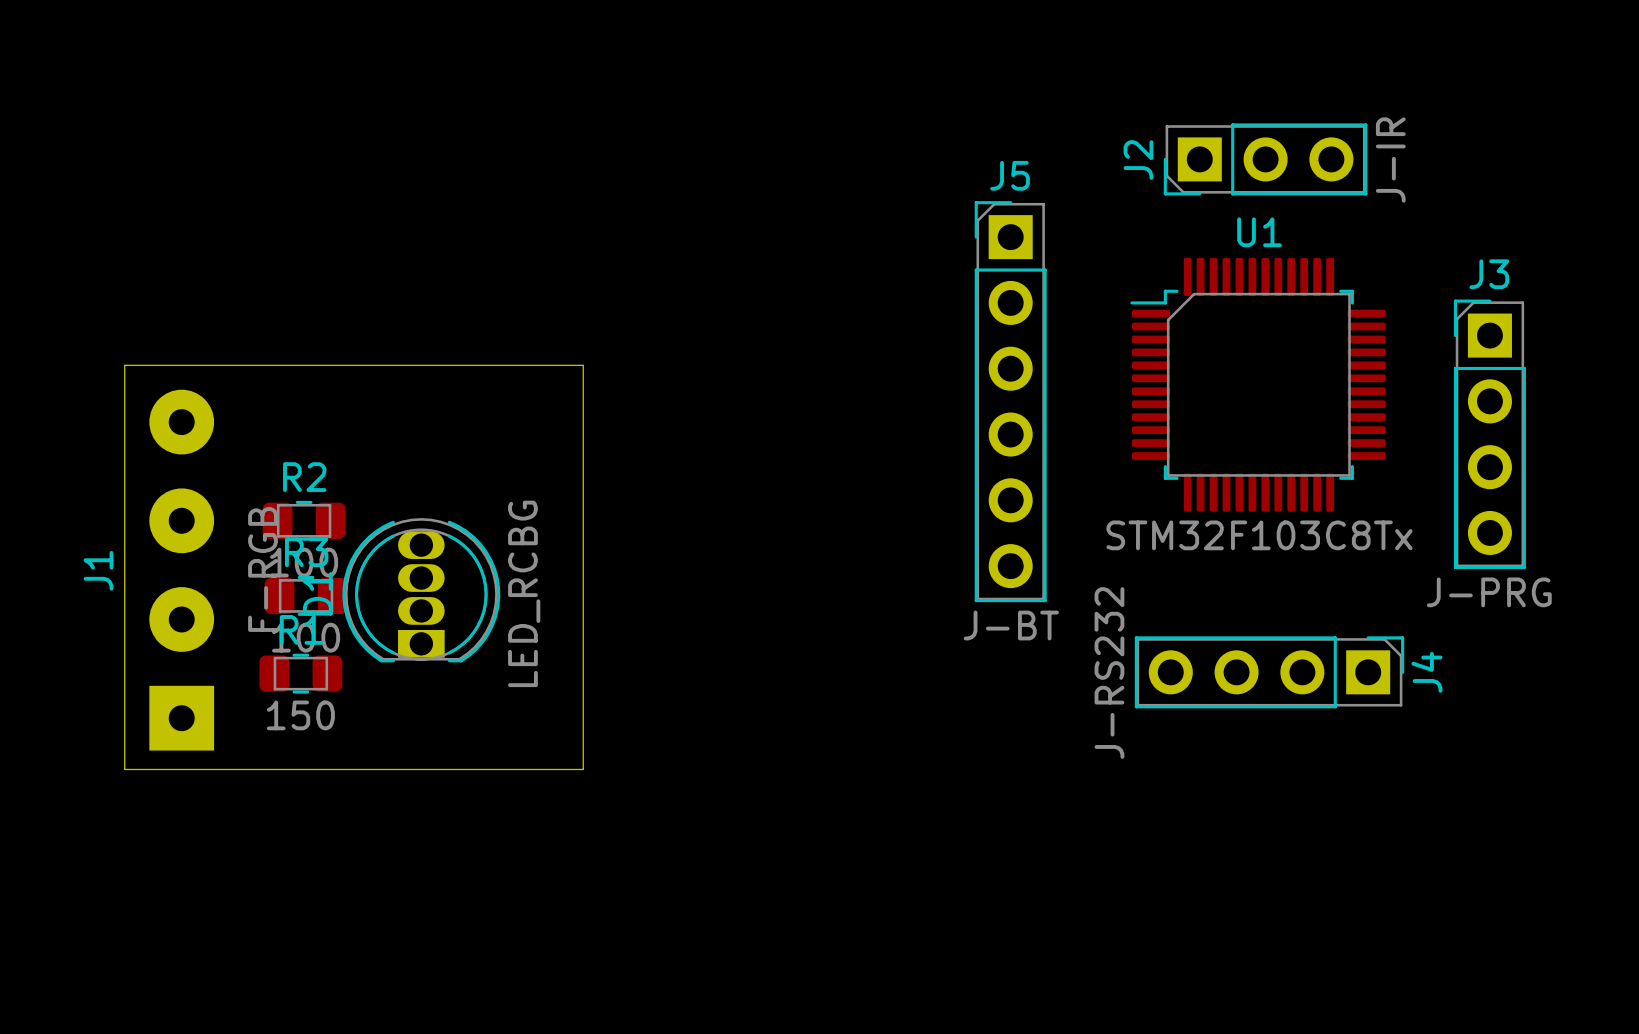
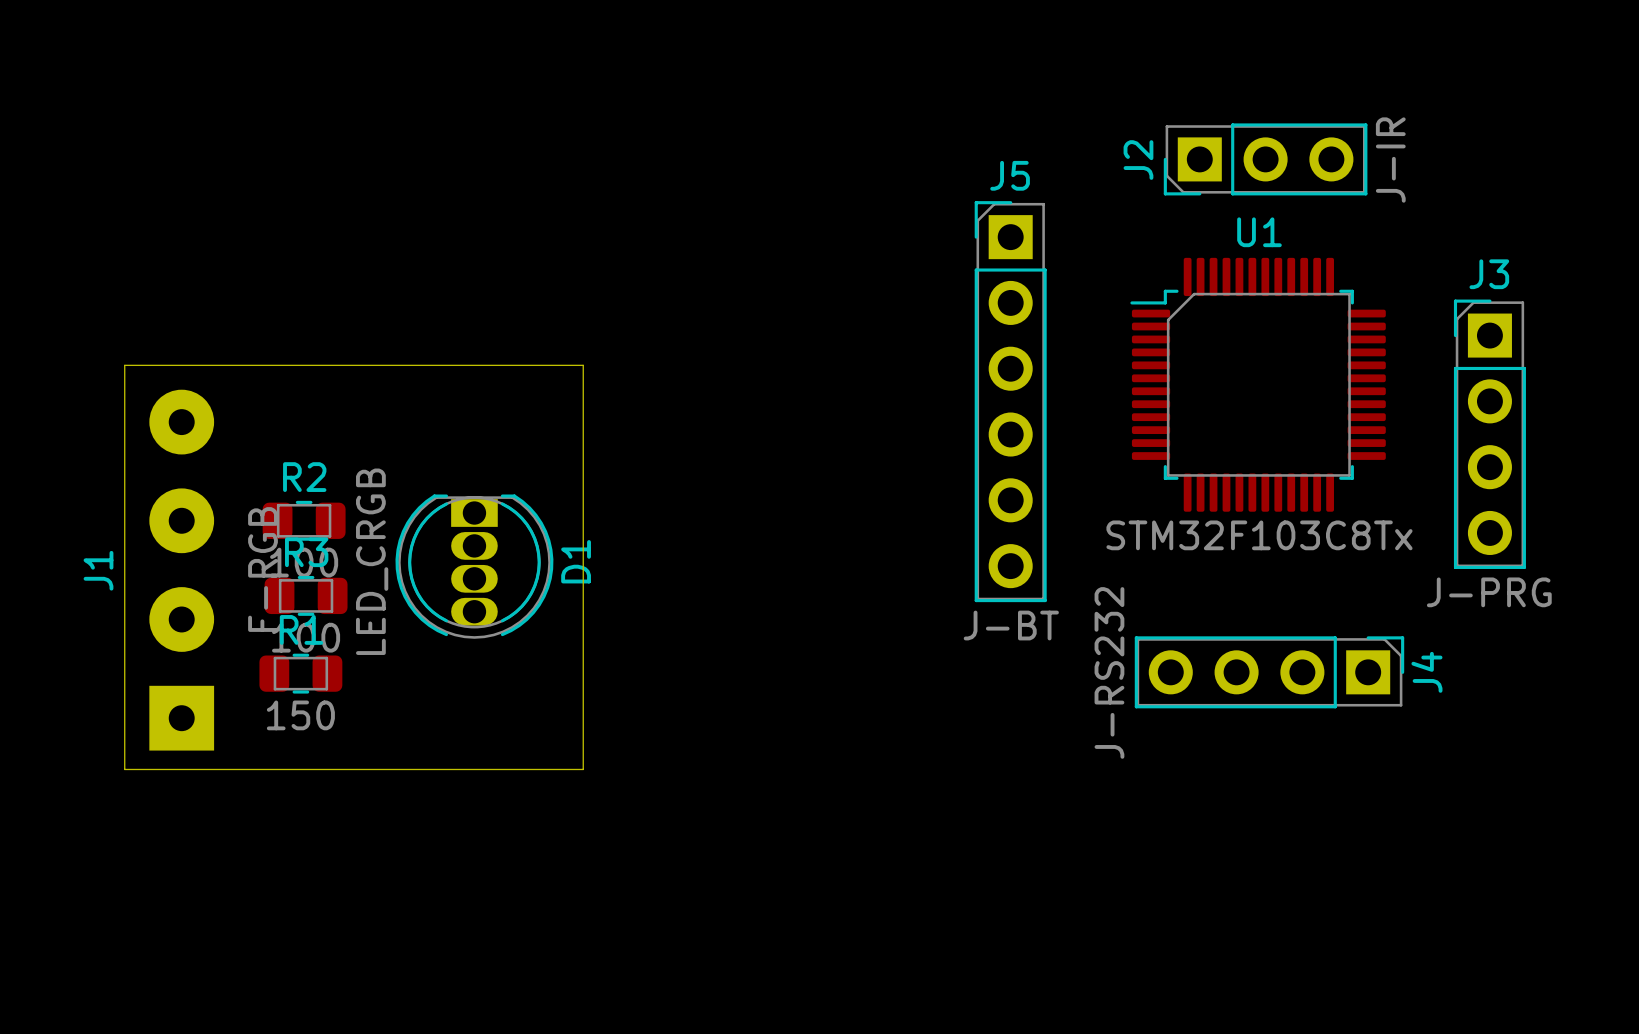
D1 rotation: 0° (421, 590) -> 180° (474, 566)
D1 value: LED_RCBG (524, 593) -> LED_CRGB (372, 561)

